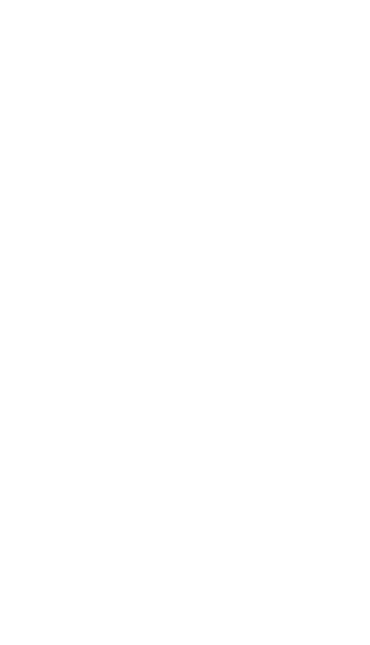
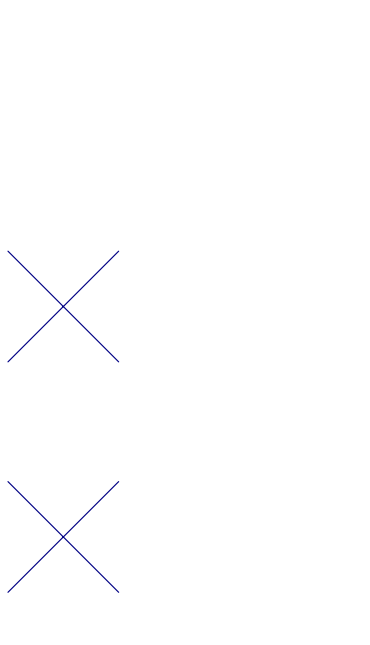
no-connect mark: none -> (63, 306)
no-connect mark: none -> (63, 536)

